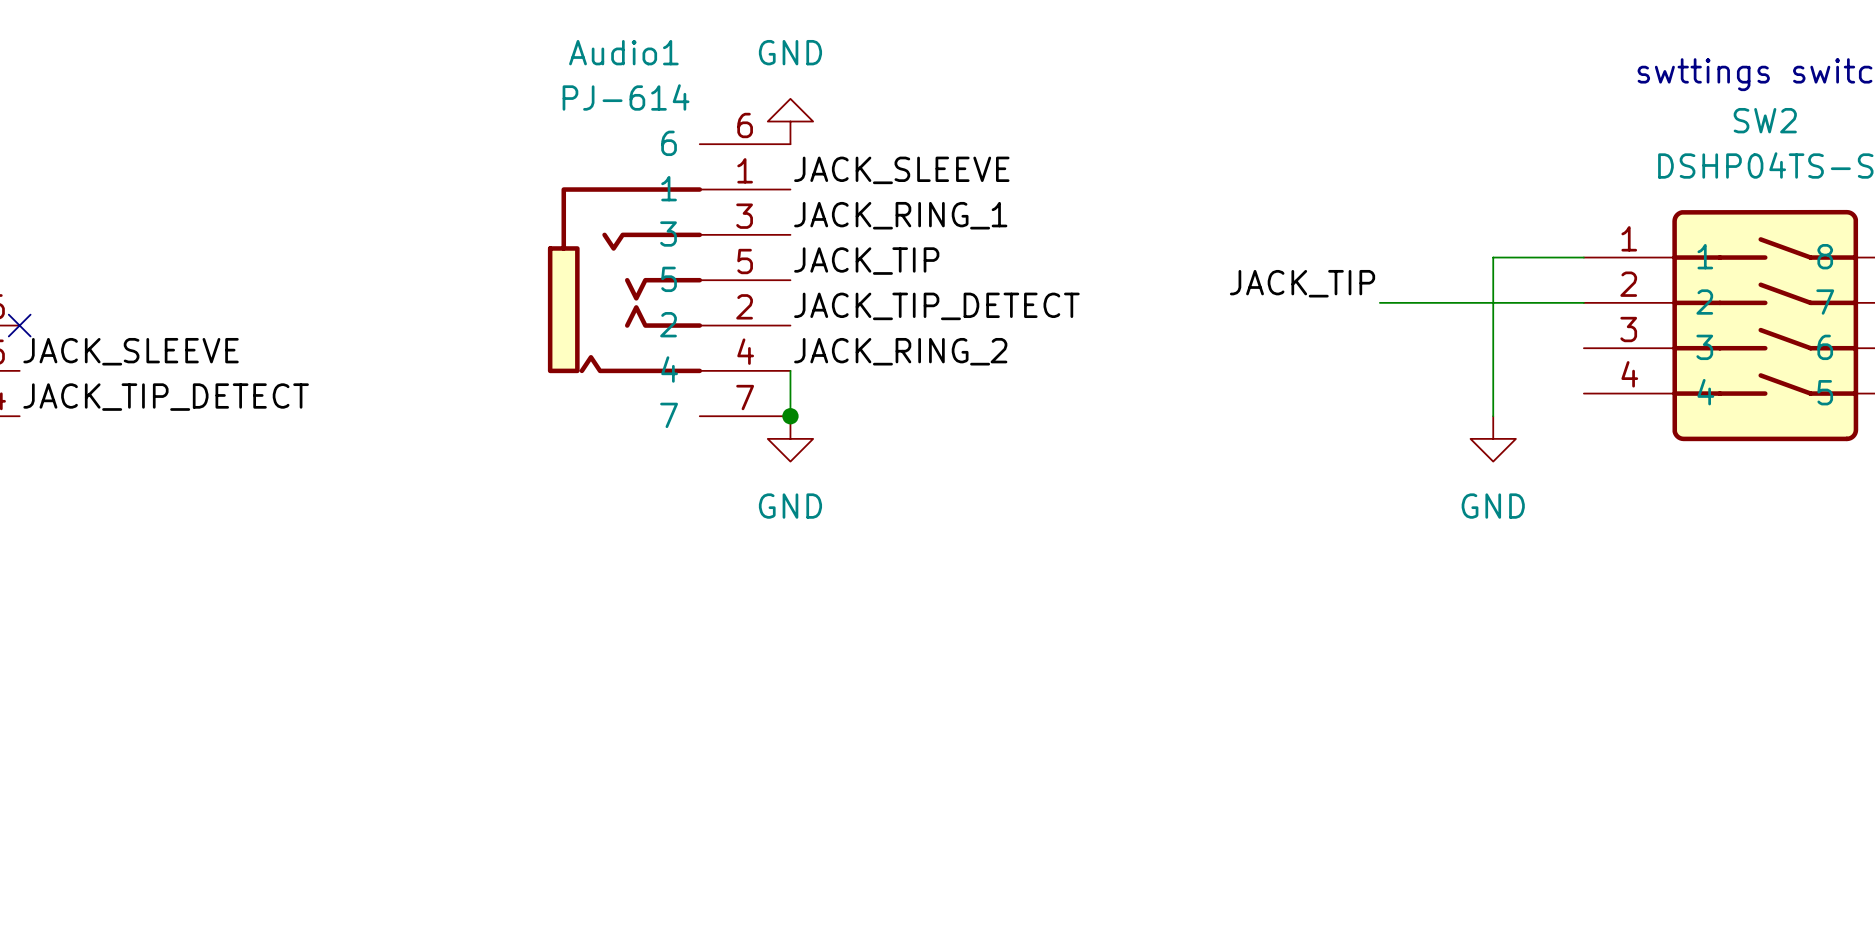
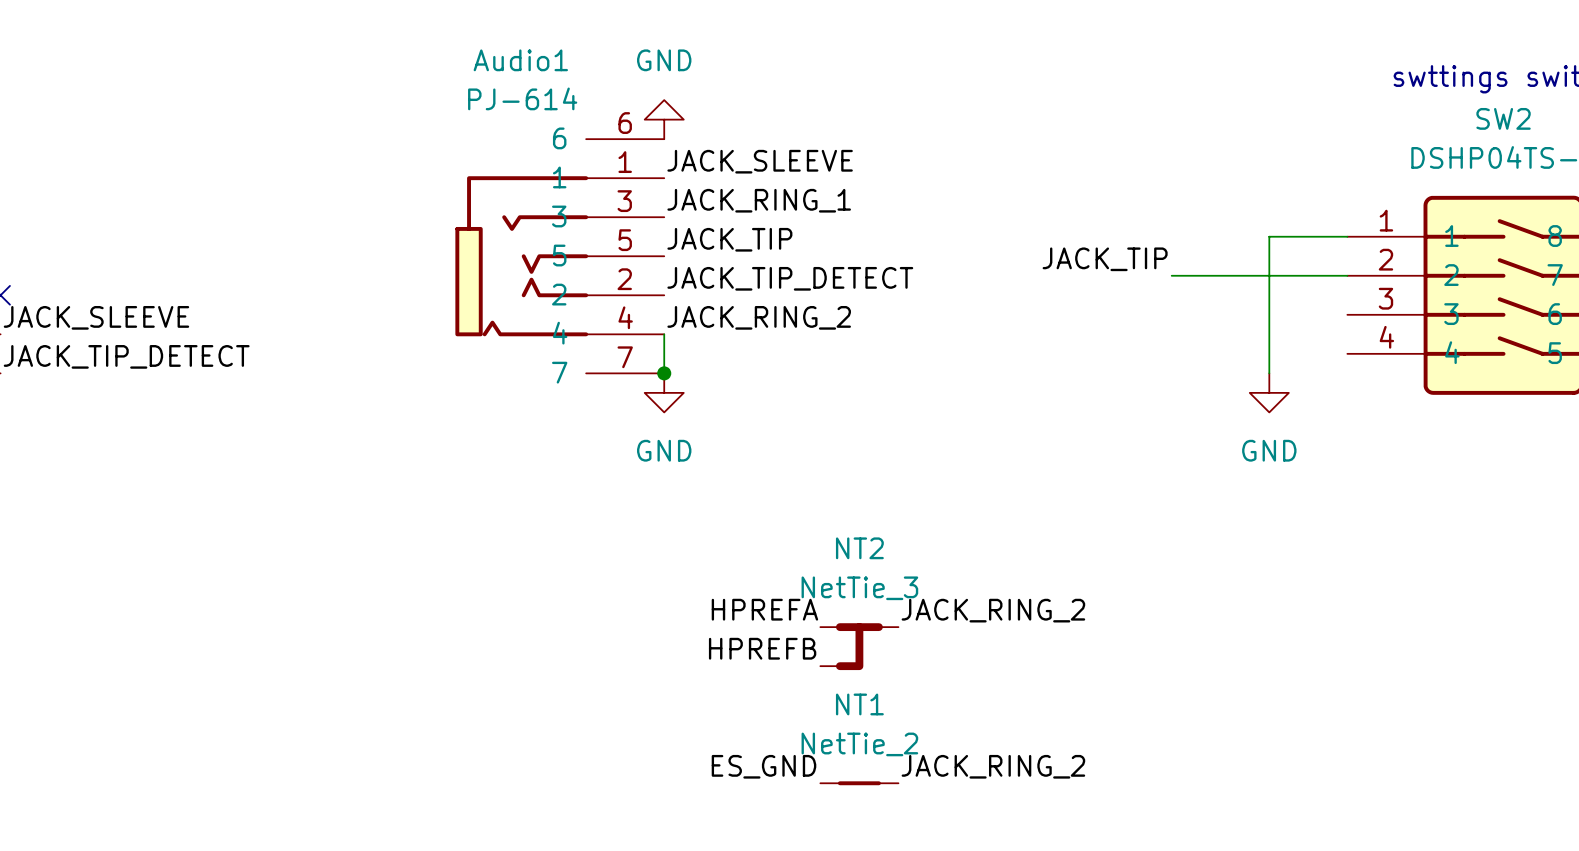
label: none -> HPREFA (764, 609)
label: none -> JACK_RING_2 (993, 610)
NT2: none -> NetTie_3 (859, 646)
label: none -> HPREFB (762, 648)
label: none -> ES_GND (764, 766)
label: none -> JACK_RING_2 (993, 766)
NT1: none -> NetTie_2 (859, 783)

